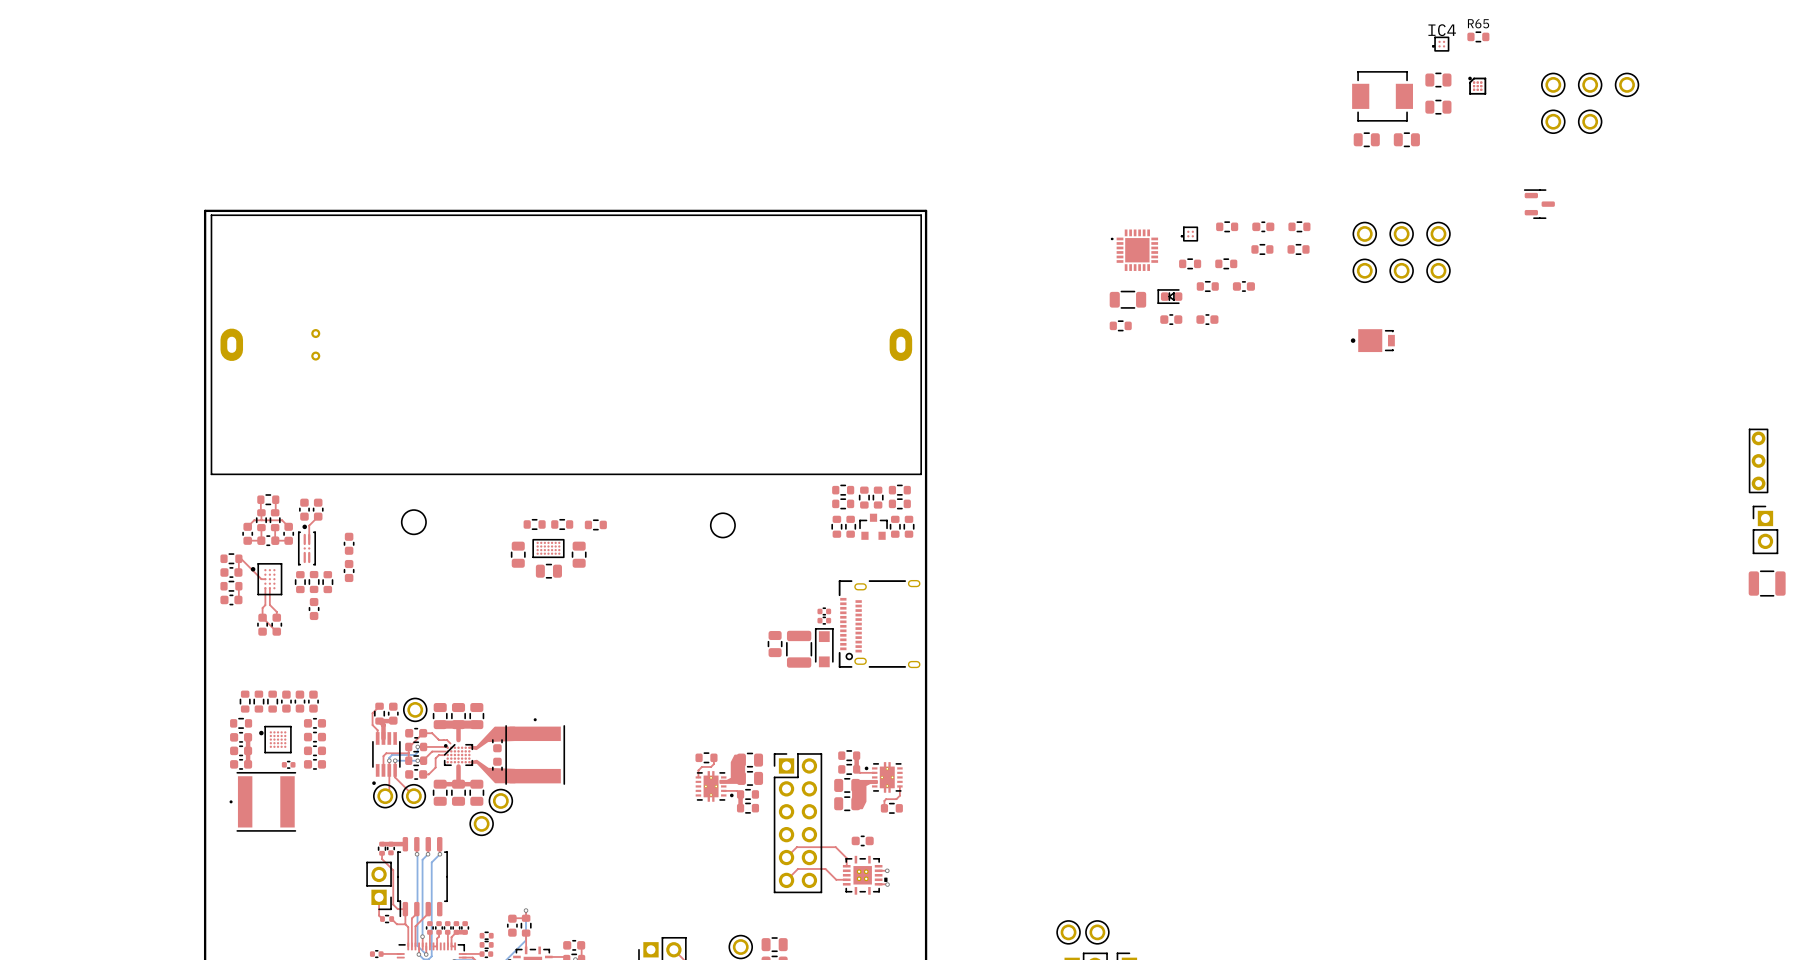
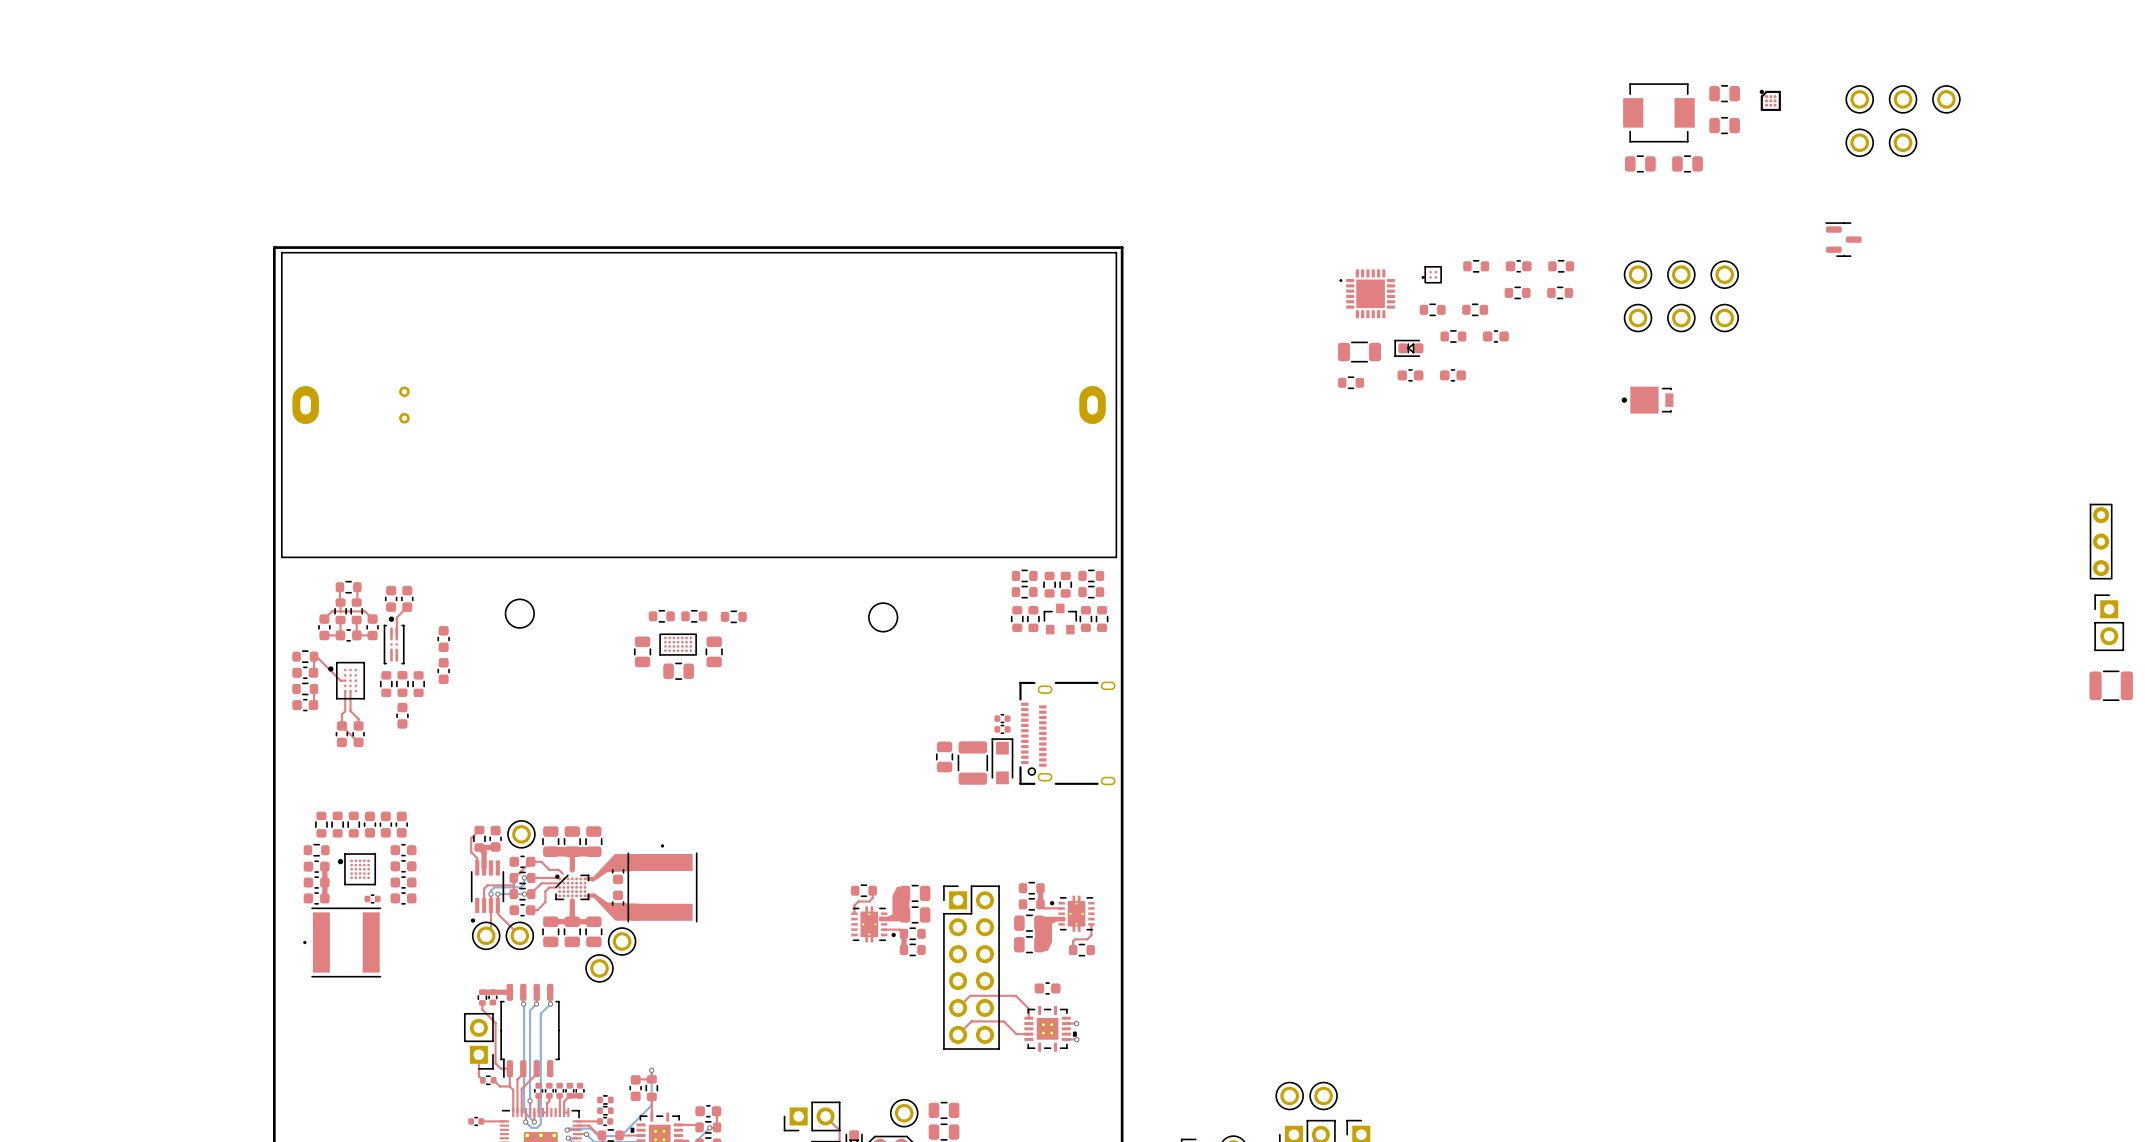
R65: (1478, 36) -> none
IC4: (1440, 44) -> none

